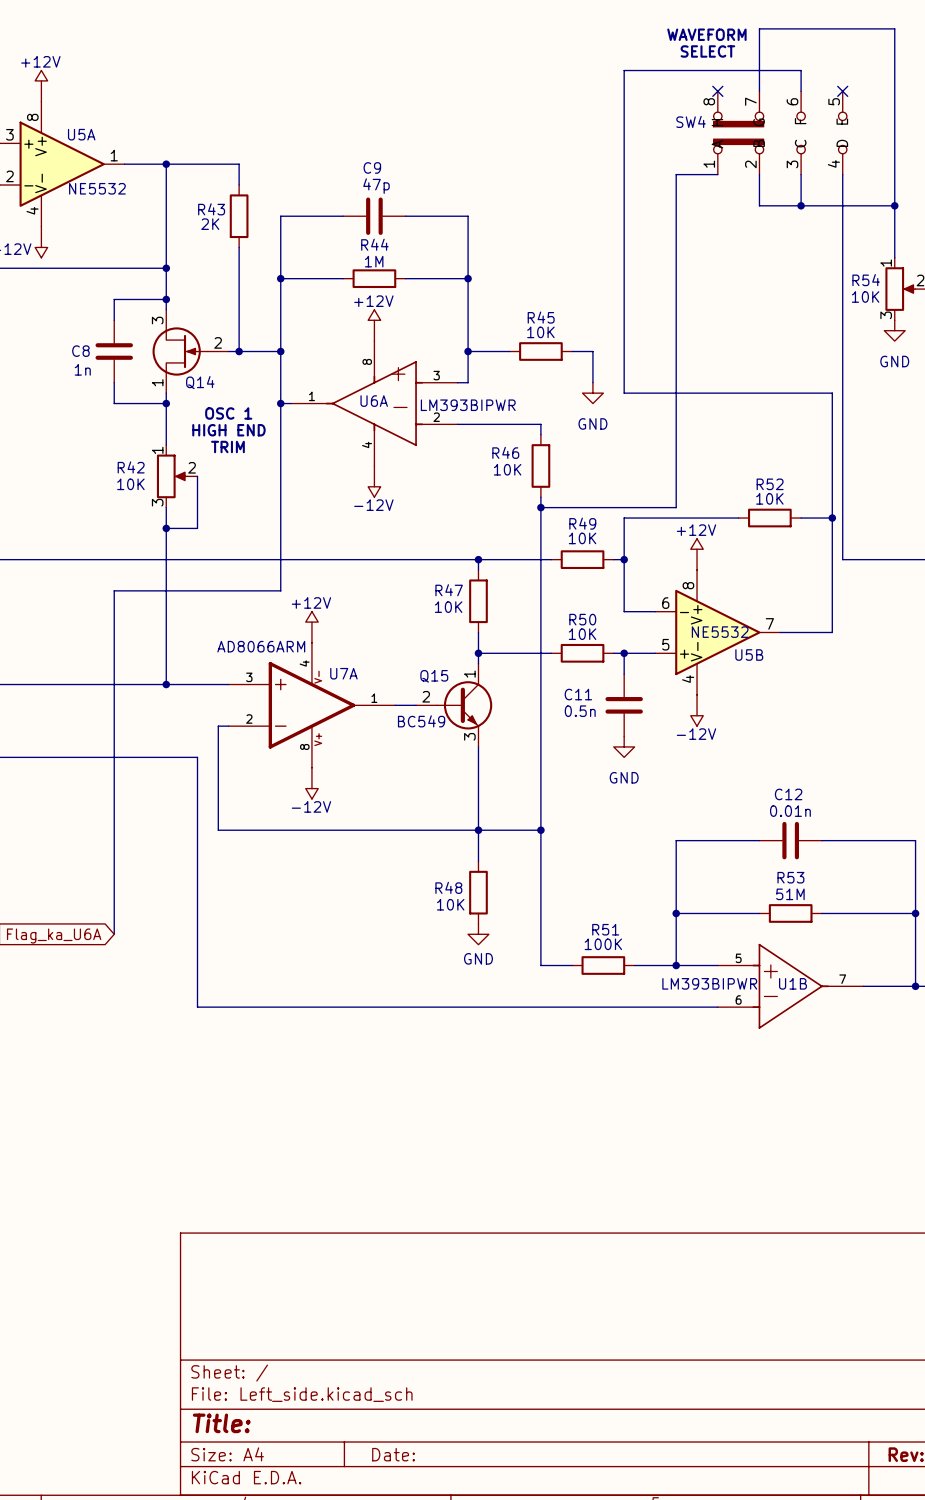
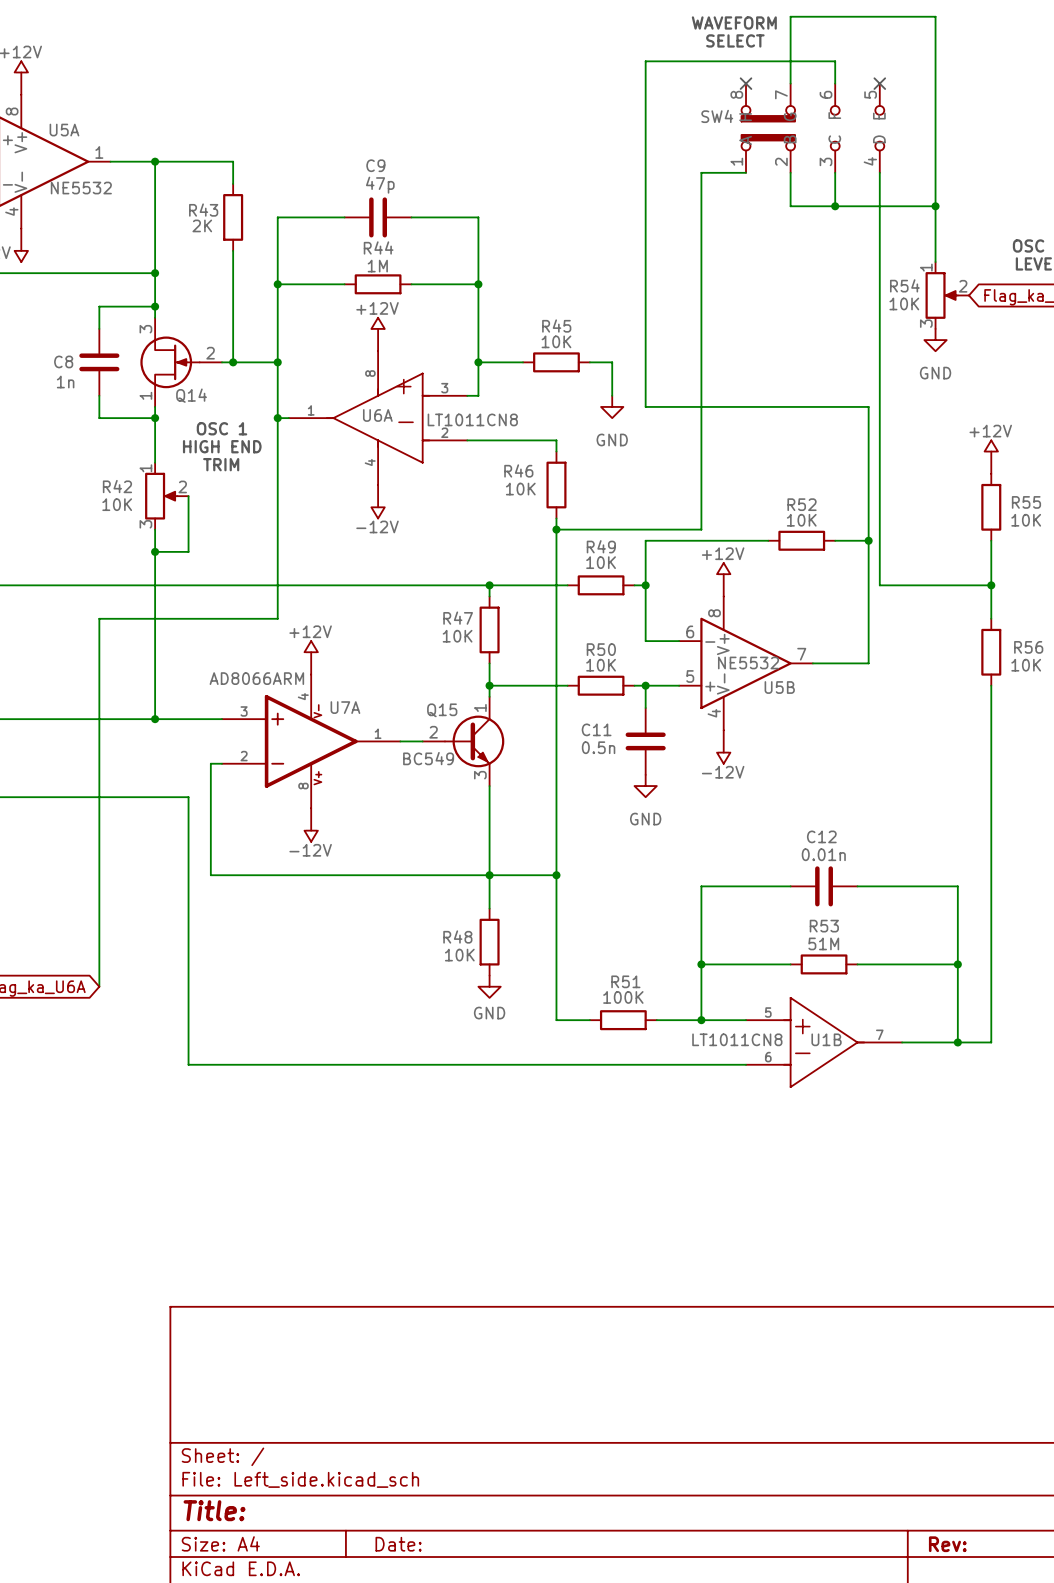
U6A value: LM393BIPWR (468, 405) -> LT1011CN8 (472, 419)
U1B value: LM393BIPWR (709, 983) -> LT1011CN8 (737, 1039)

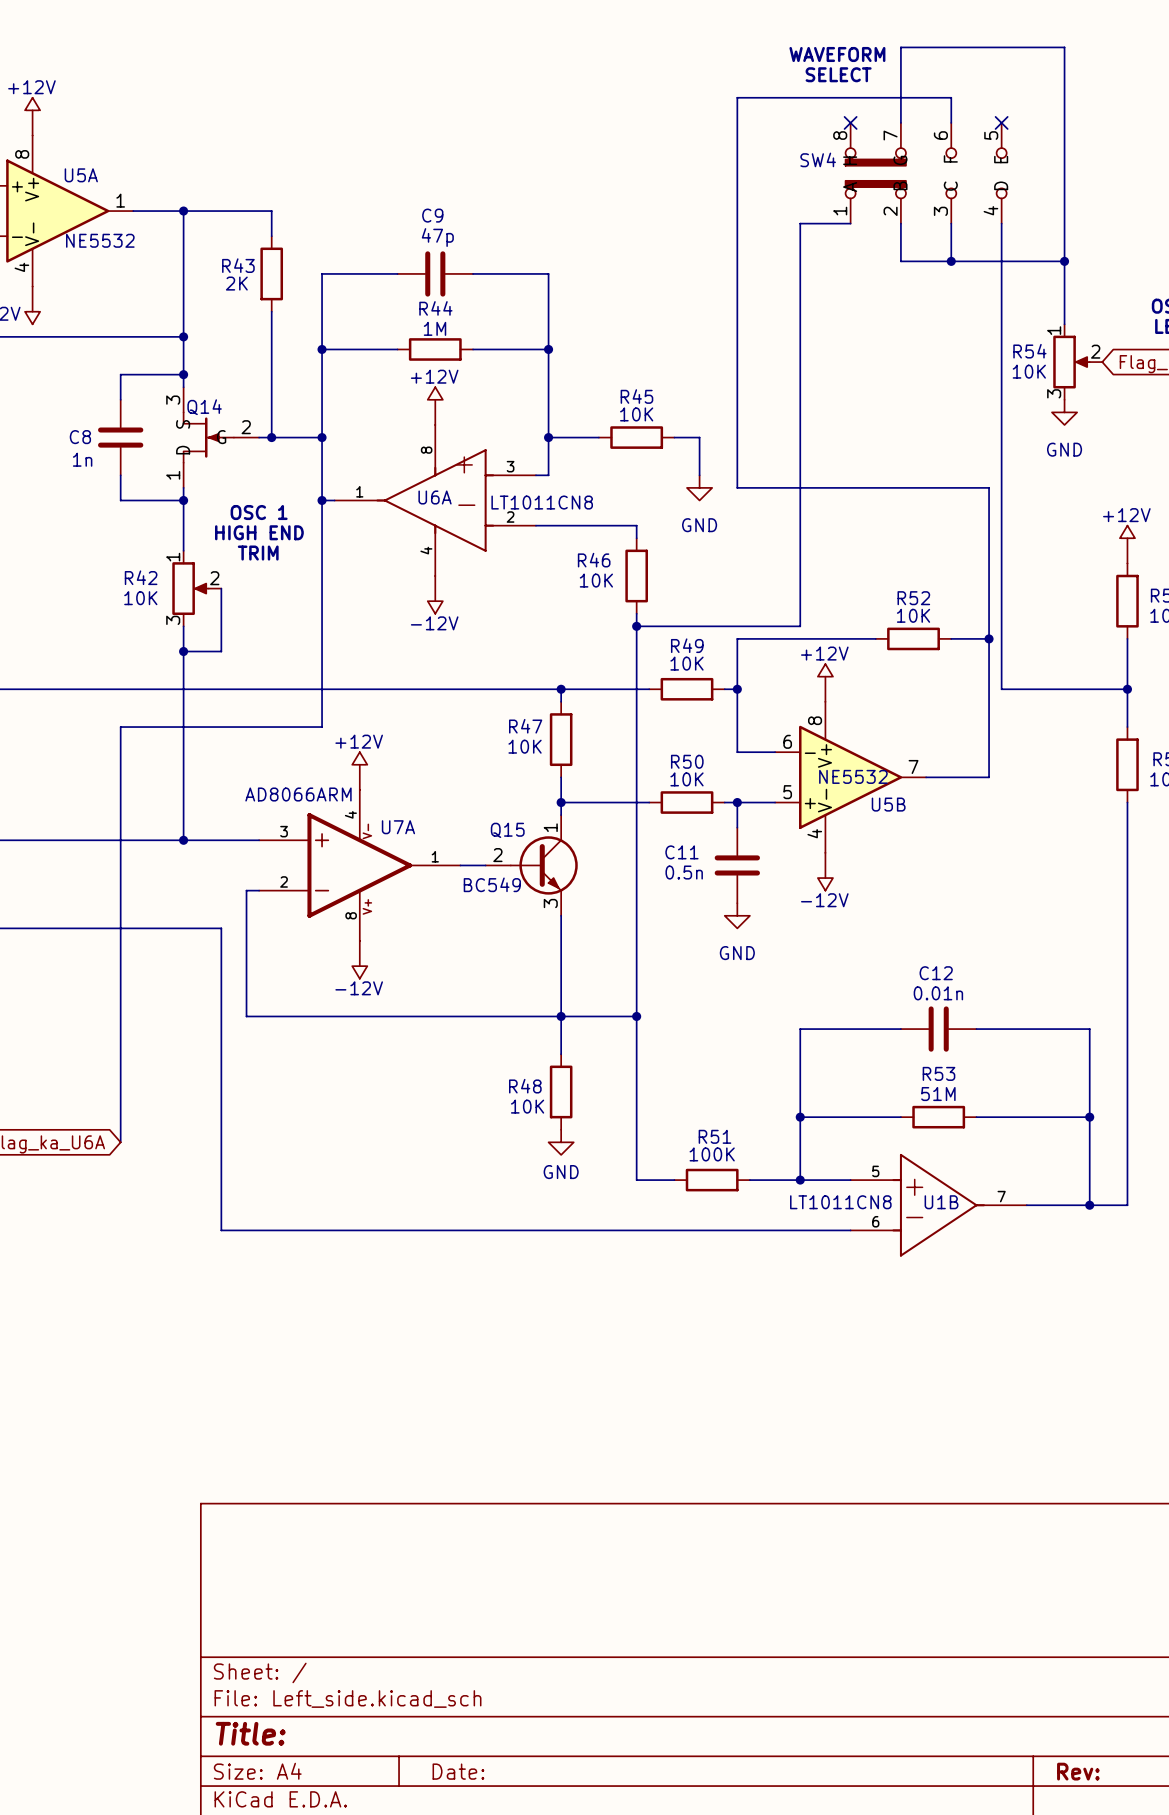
Q14 symbol: [140, 317, 222, 407] -> [183, 387, 260, 488]
Q14 name position: Q14 (191, 395) -> Q14 (204, 407)

